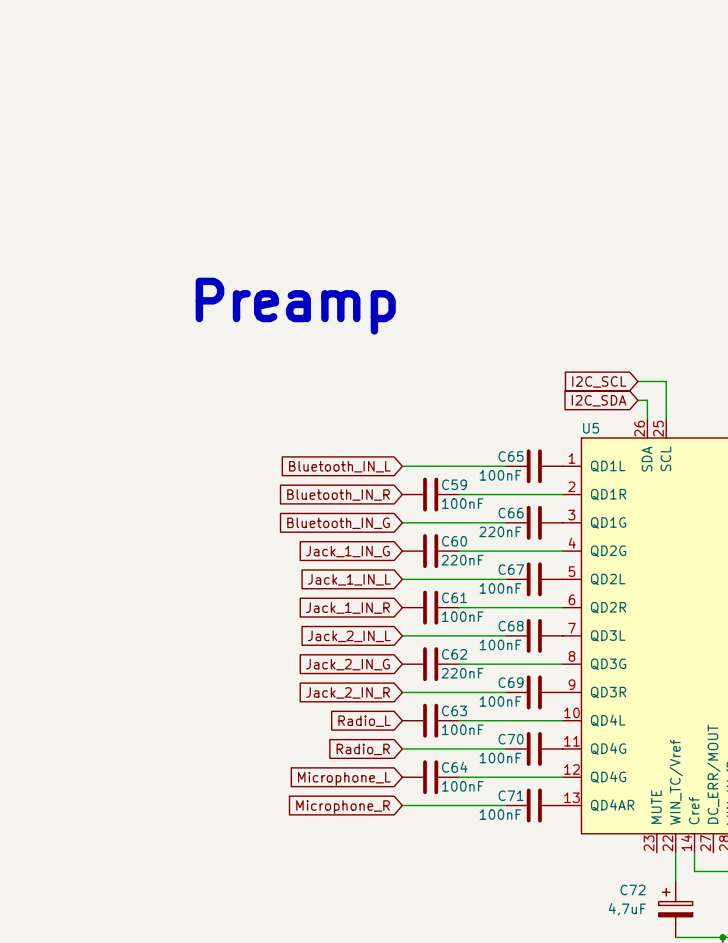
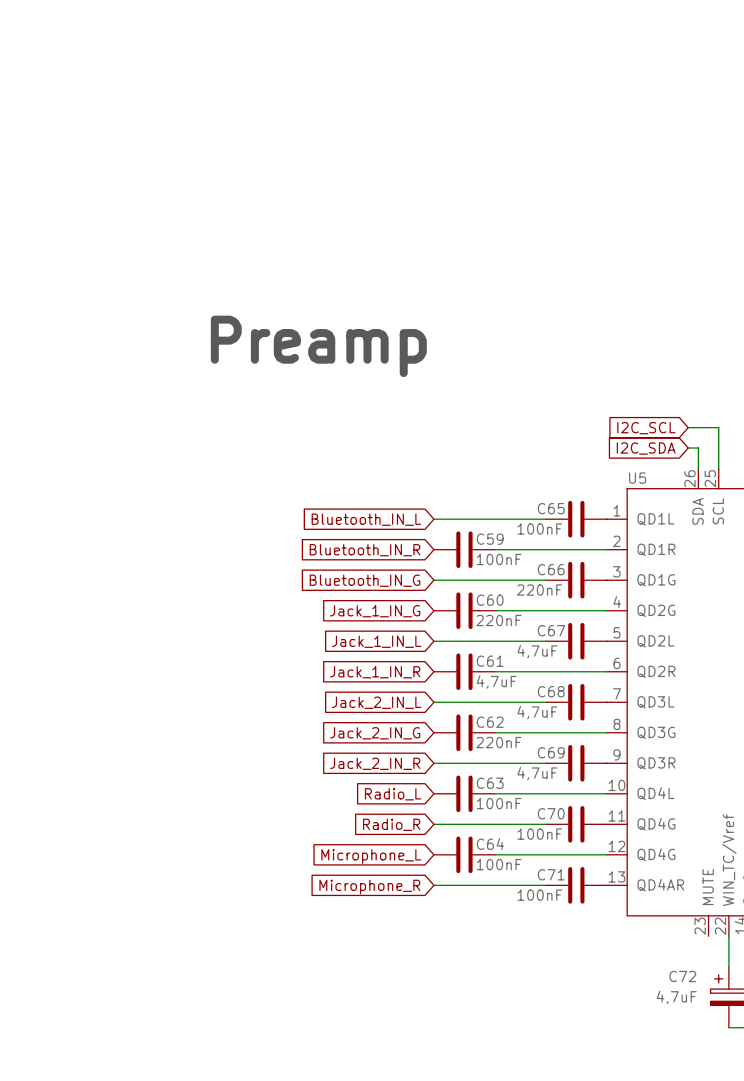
C67 value: 100nF (500, 588) -> 4,7uF (537, 651)
C61 value: 100nF (462, 616) -> 4,7uF (496, 682)
C68 value: 100nF (500, 644) -> 4,7uF (537, 712)
C69 value: 100nF (500, 701) -> 4,7uF (537, 773)

